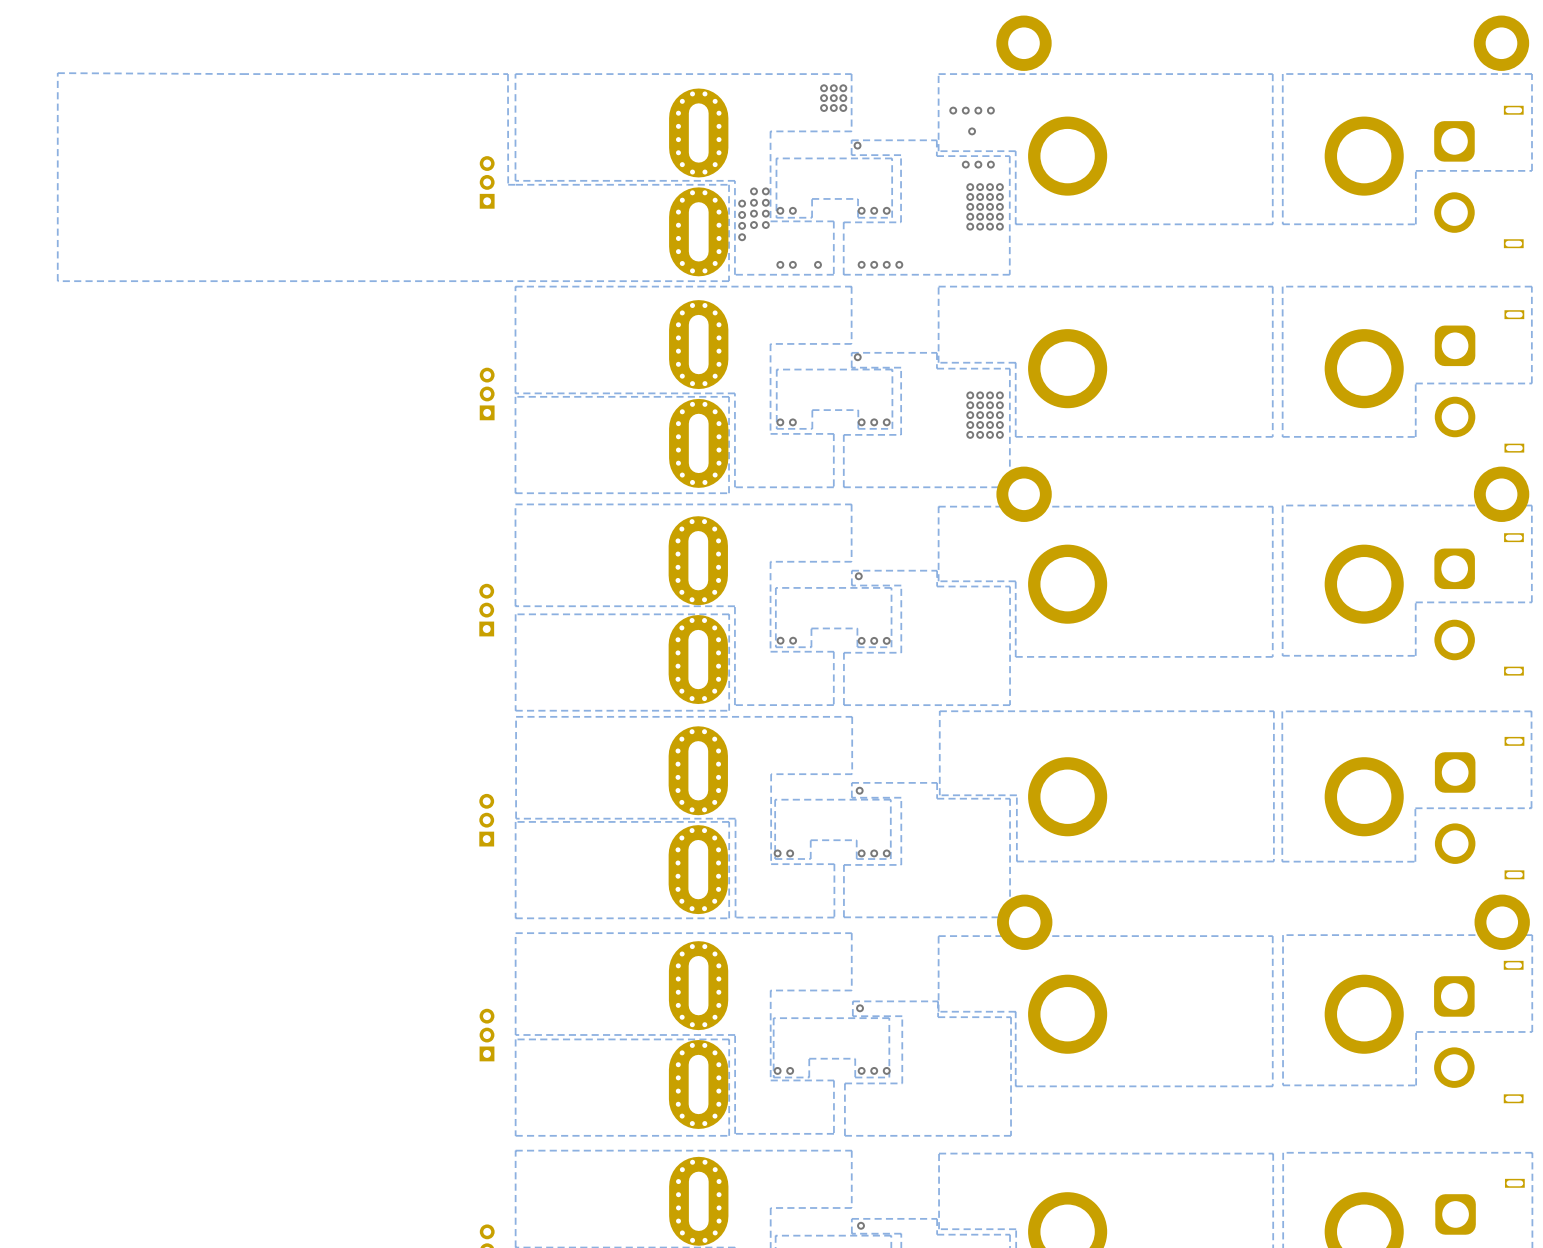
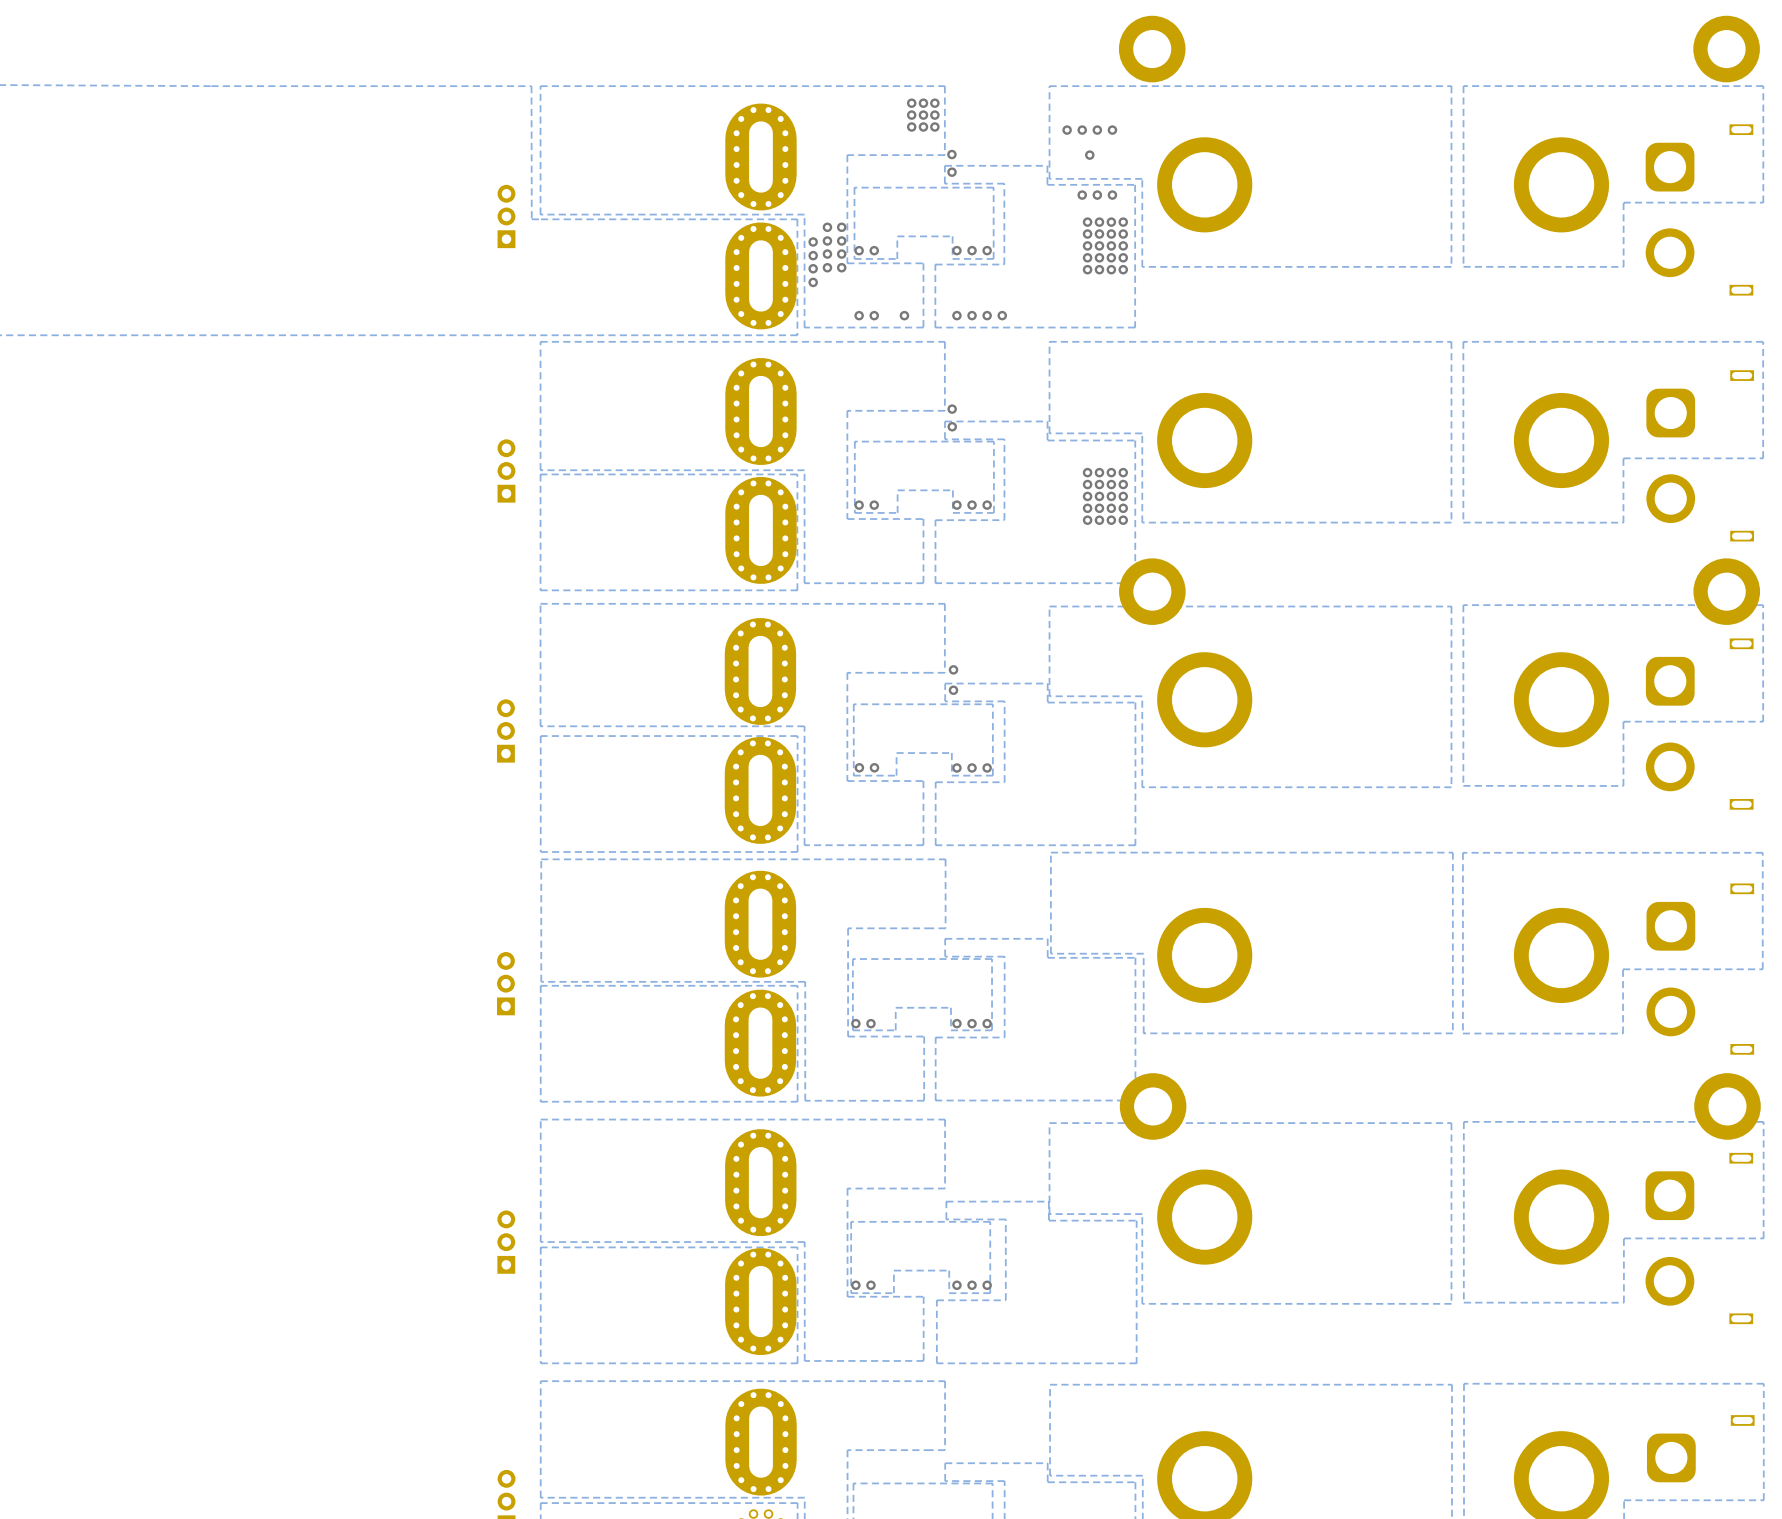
via: none -> (951, 154)
via: none -> (952, 409)
via: none -> (953, 669)
via: (859, 790) -> none
via: (860, 1008) -> none
via: (861, 1225) -> none

